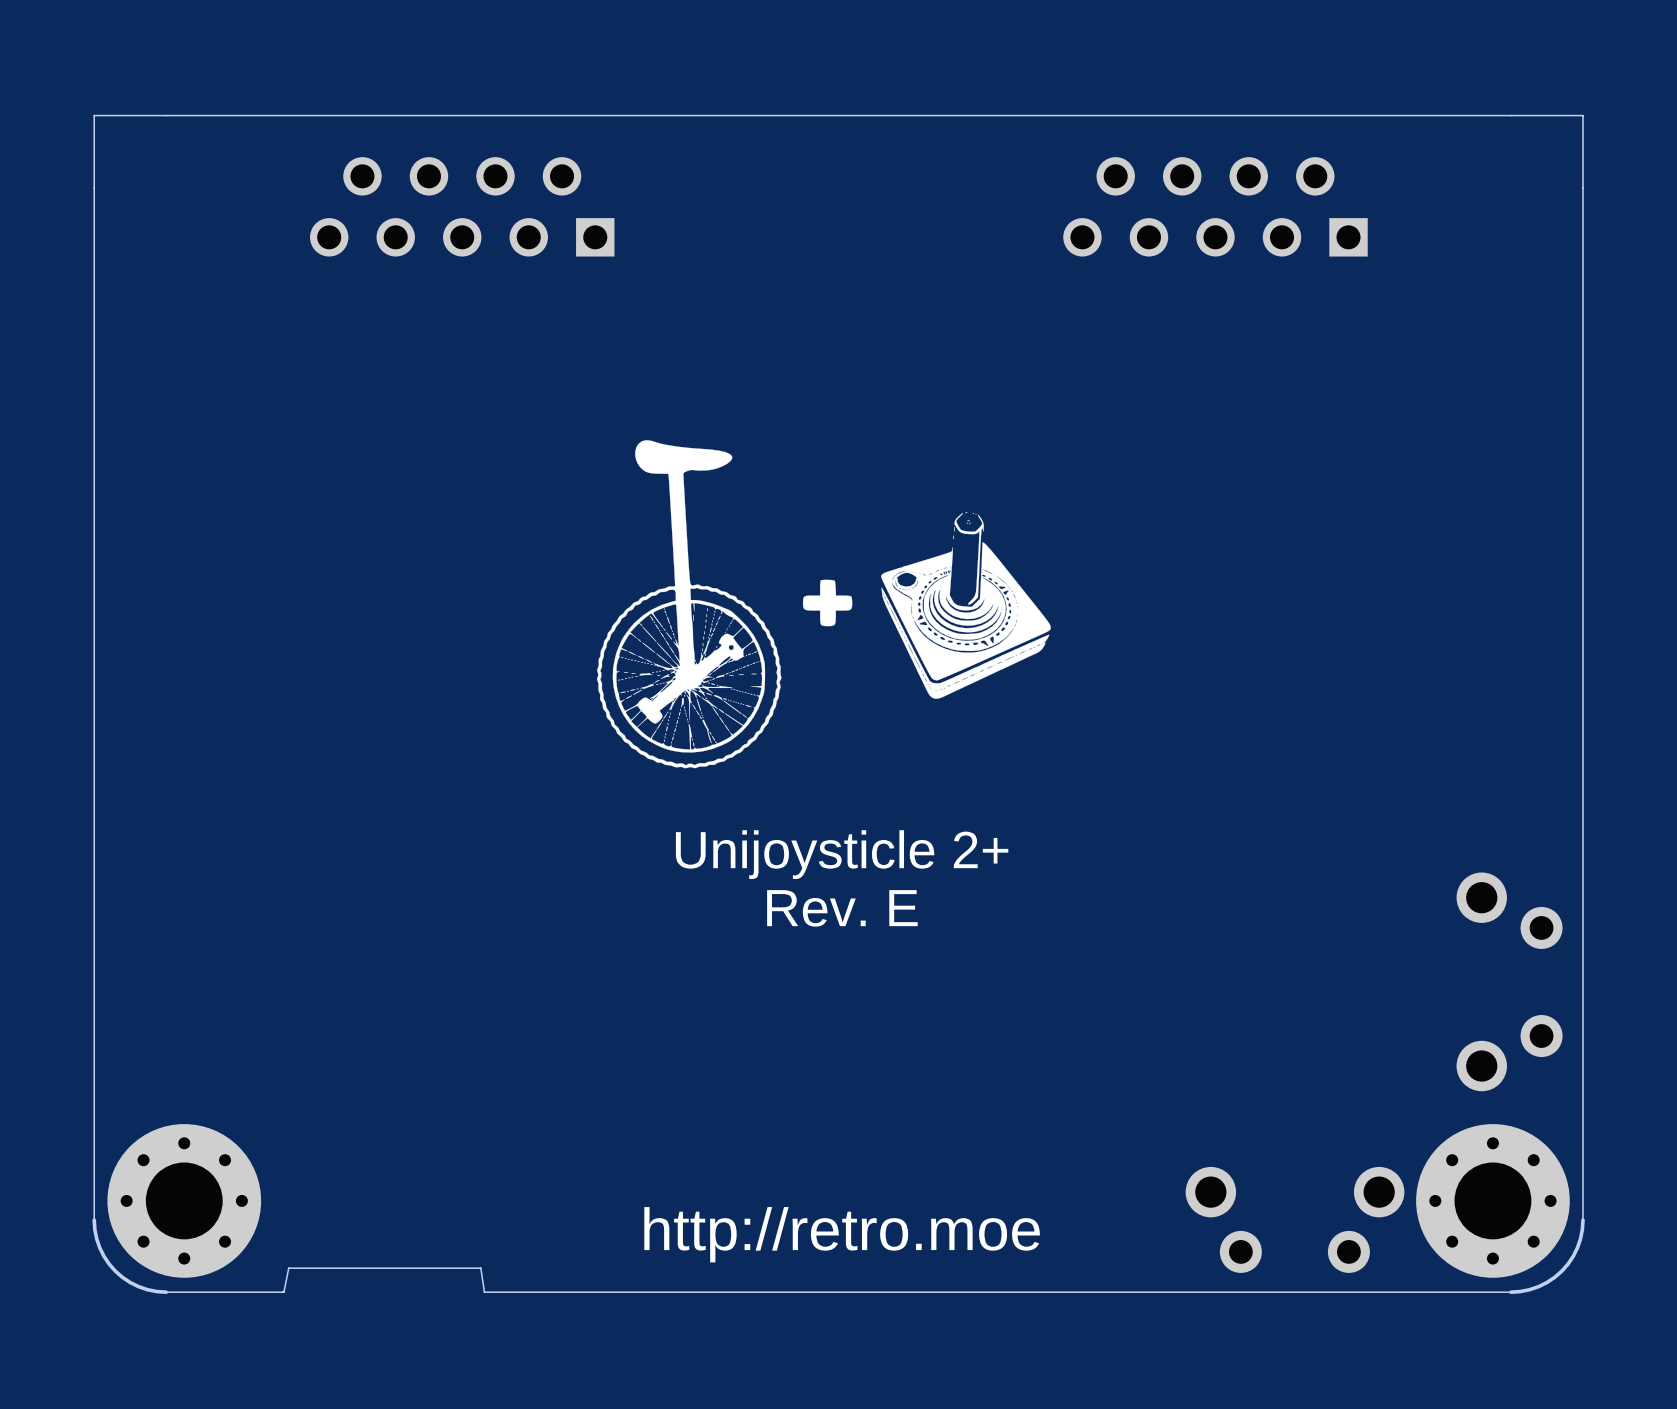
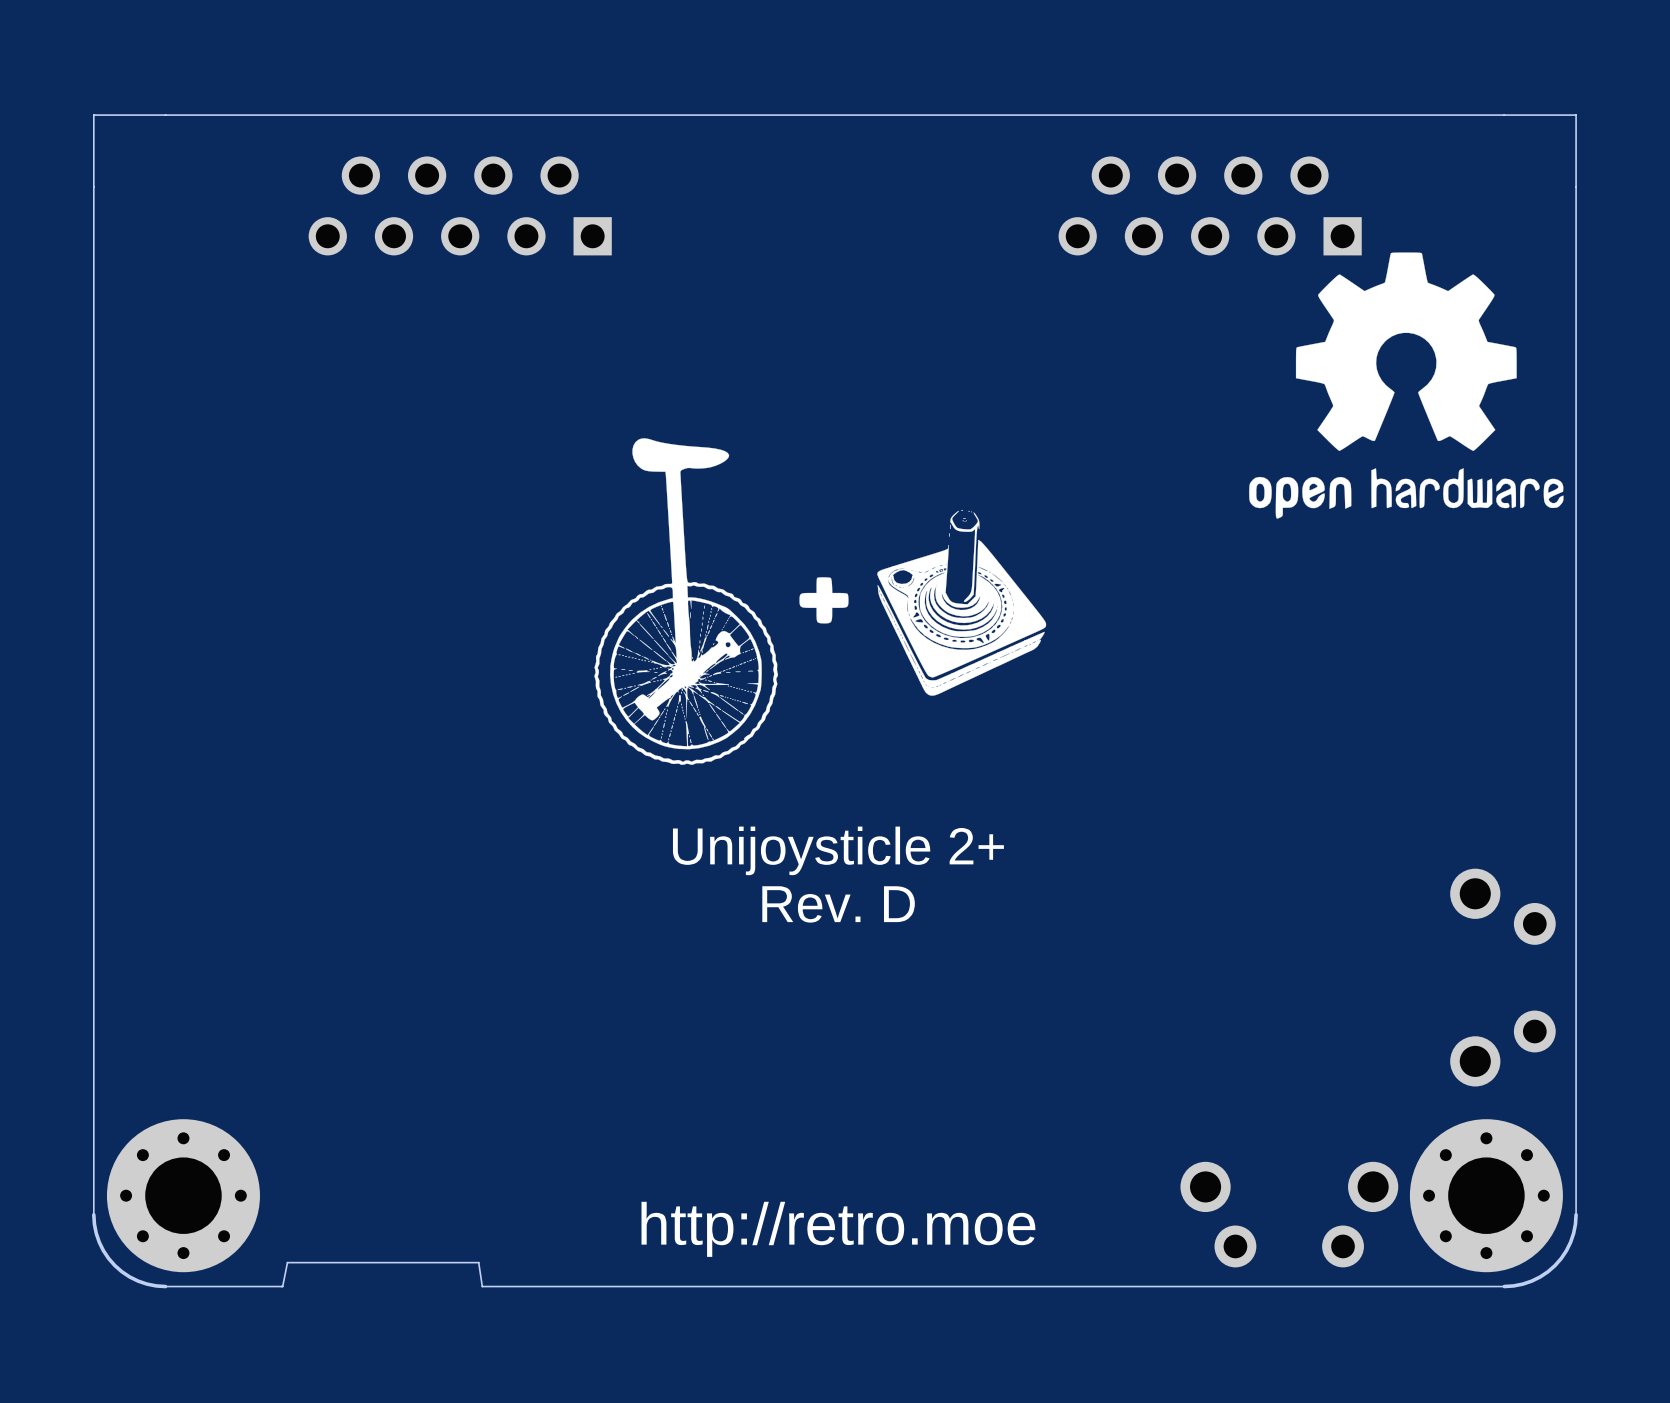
drawing: none -> [1249, 252, 1564, 519]
text: Rev. E (842, 908) -> Rev. D (838, 904)

